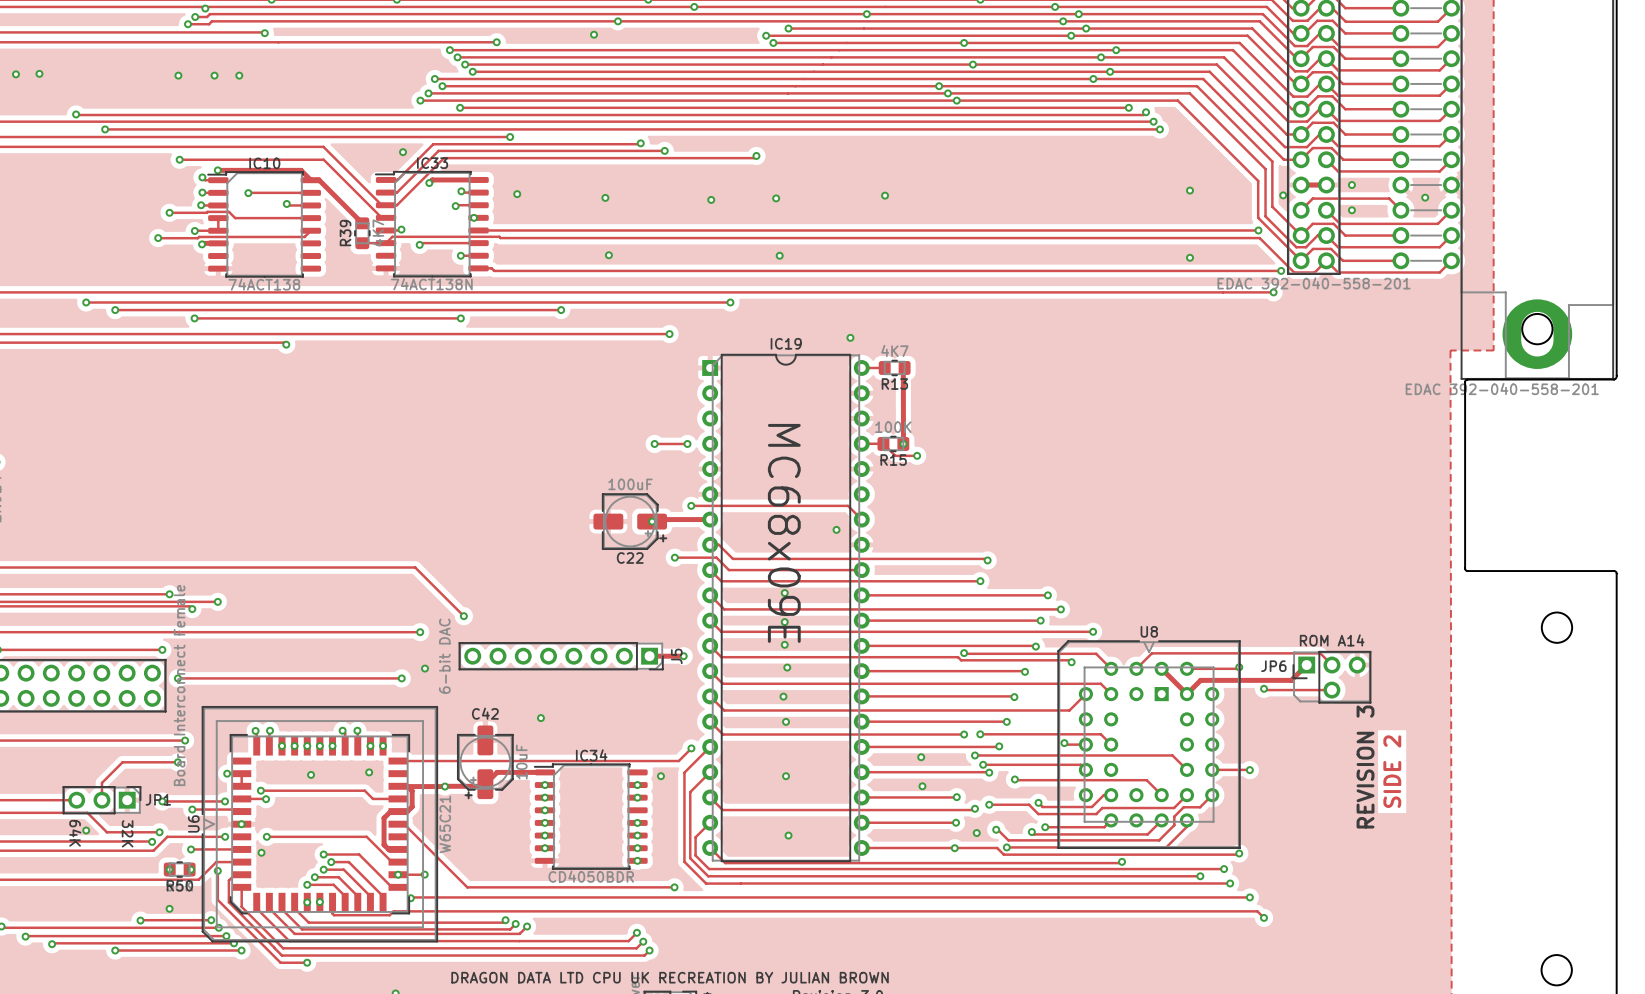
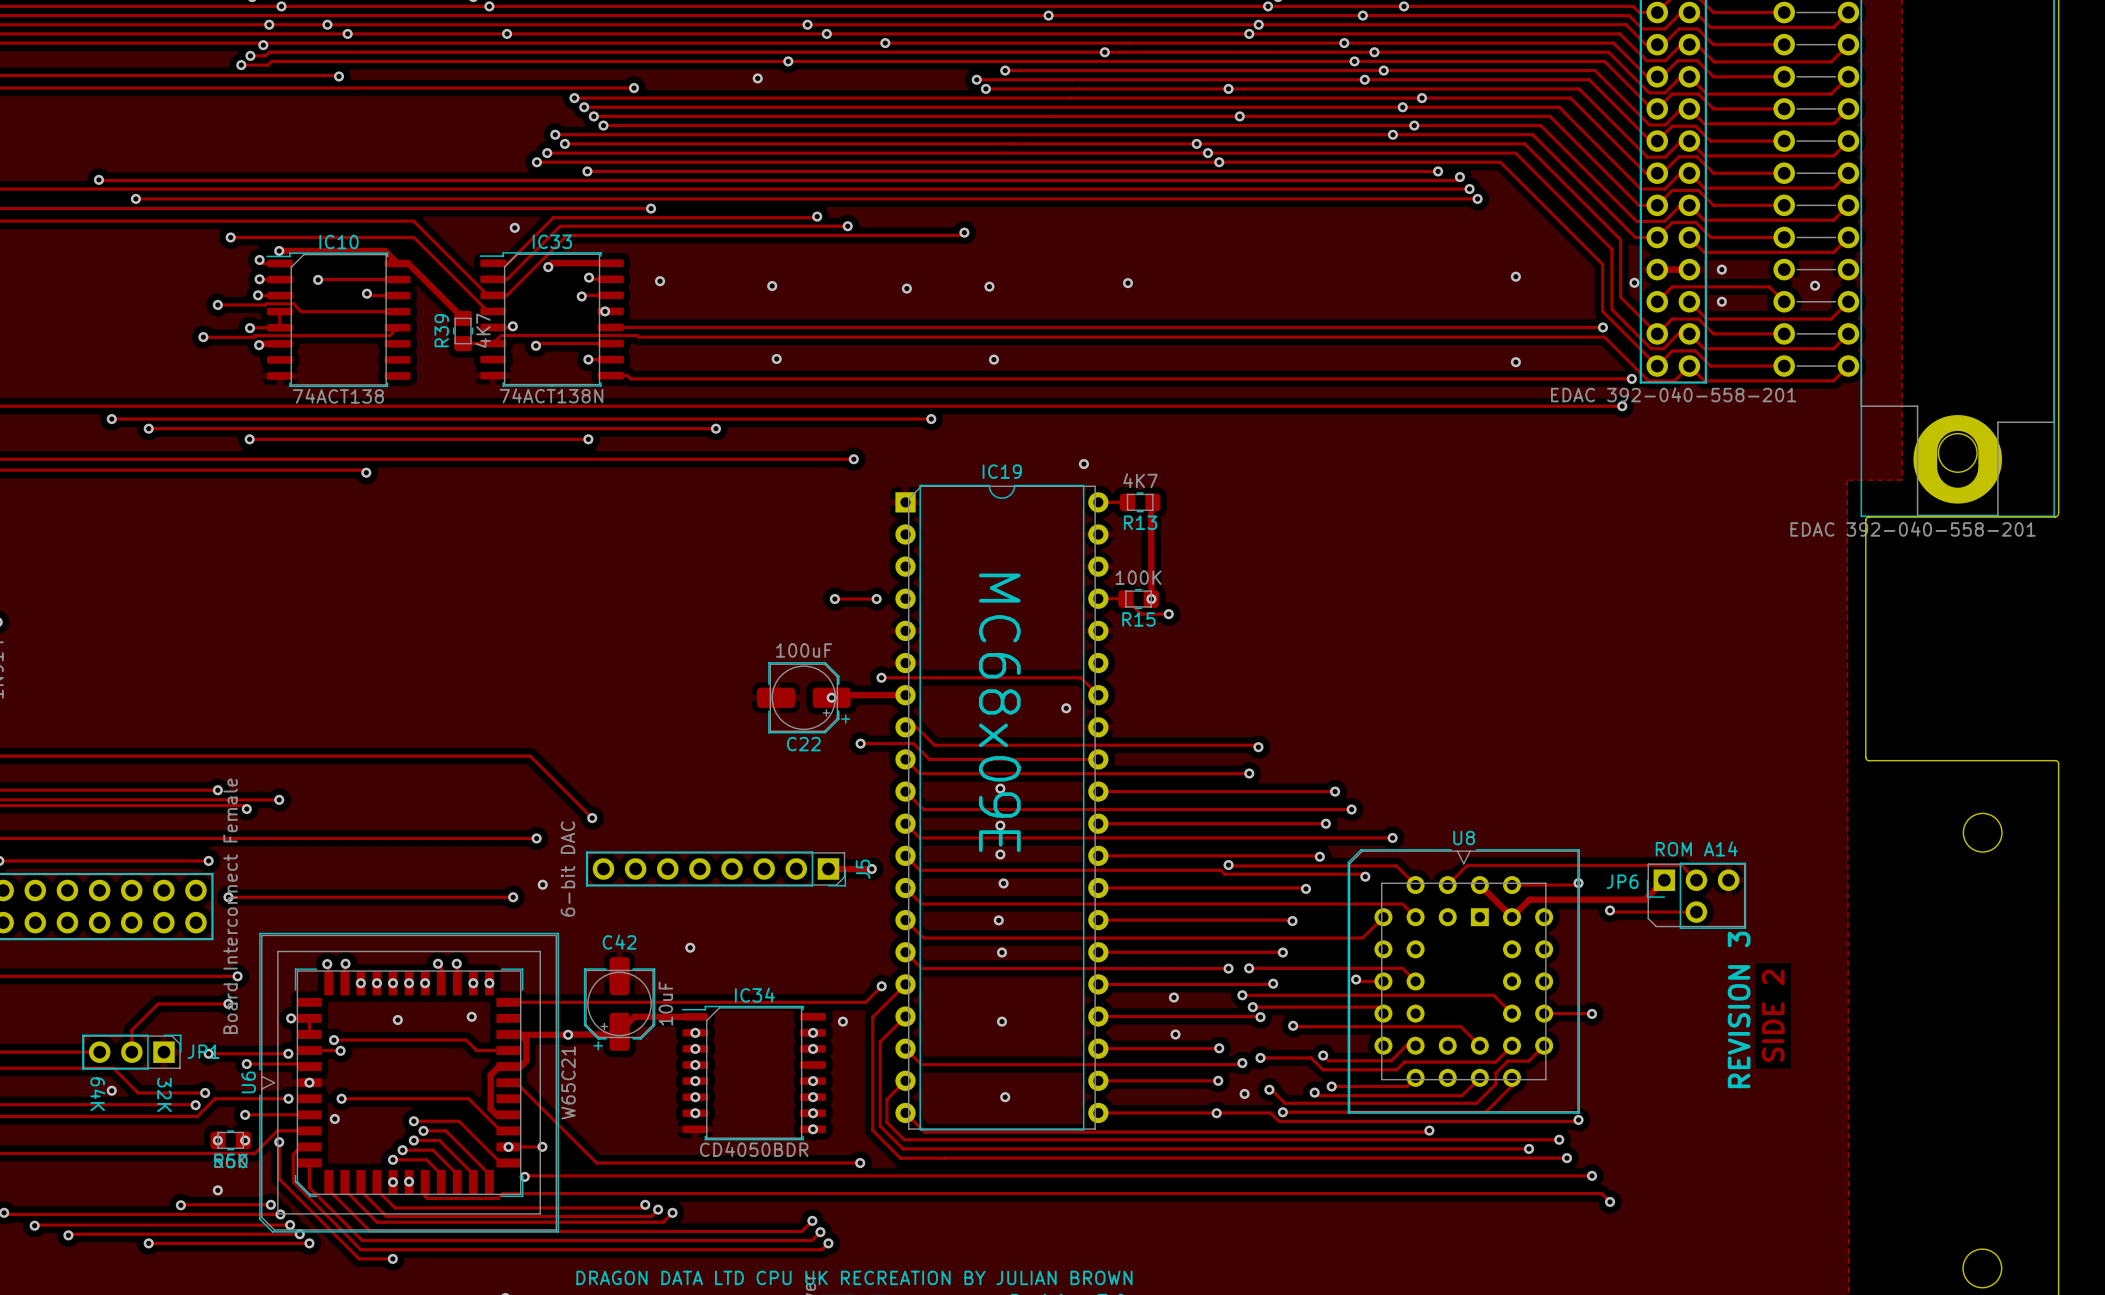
via: (39, 73) -> none
via: (15, 74) -> none
via: (178, 75) -> none
via: (214, 75) -> none
via: (239, 75) -> none

